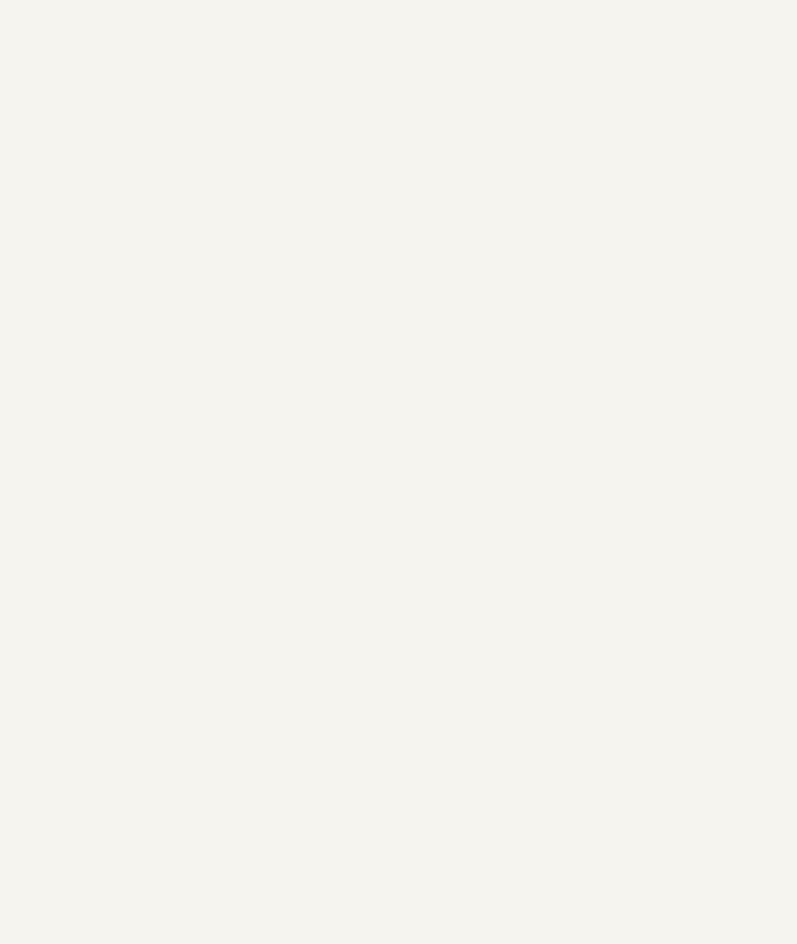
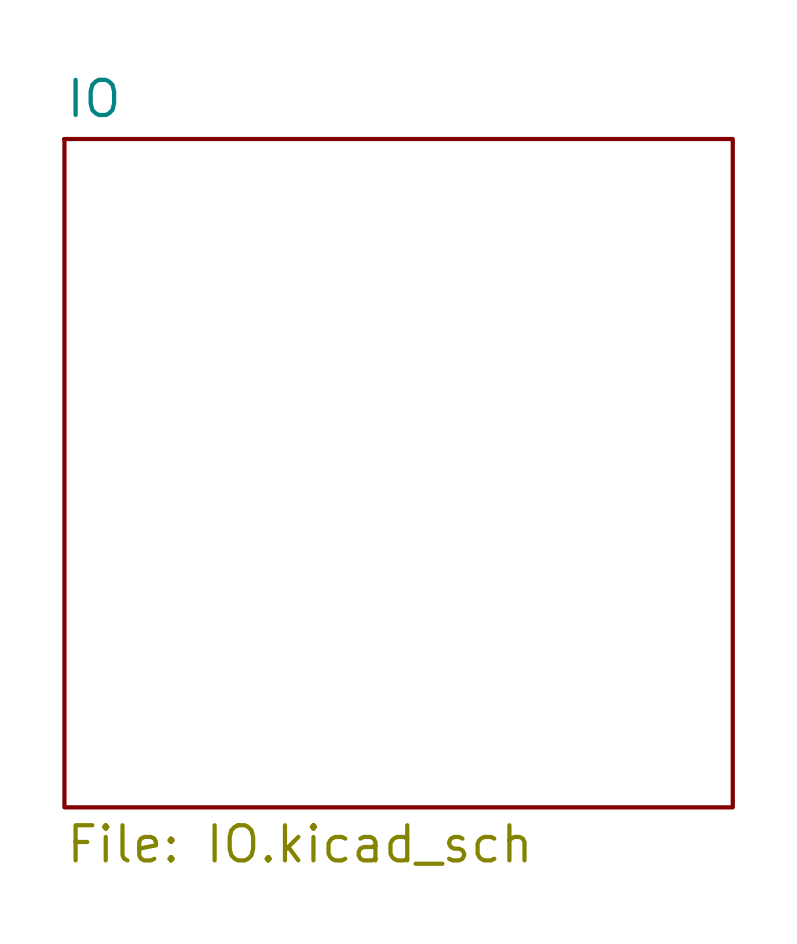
sheet IO: none -> File: IO.kicad_sch (398, 473)

